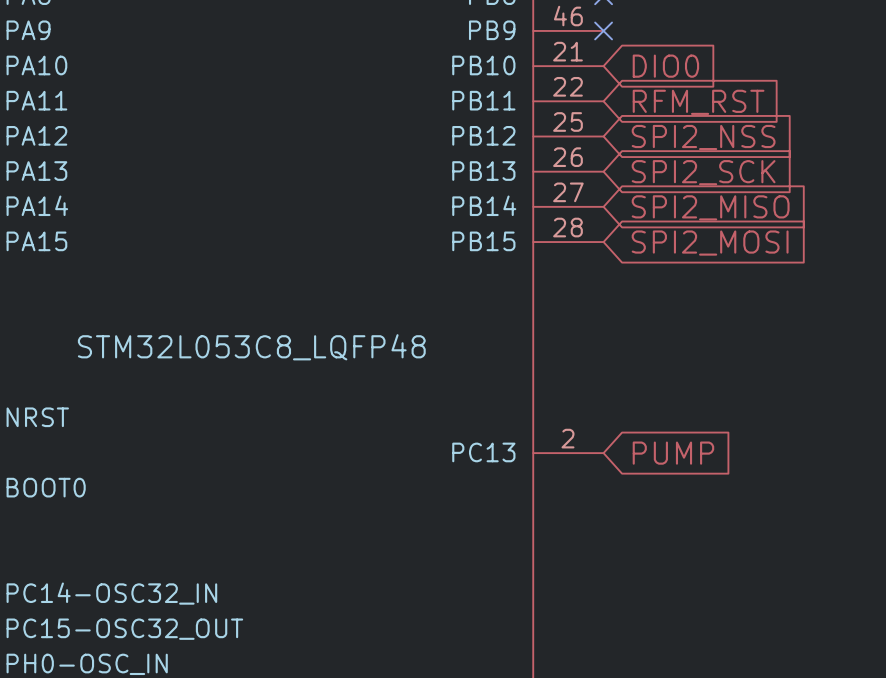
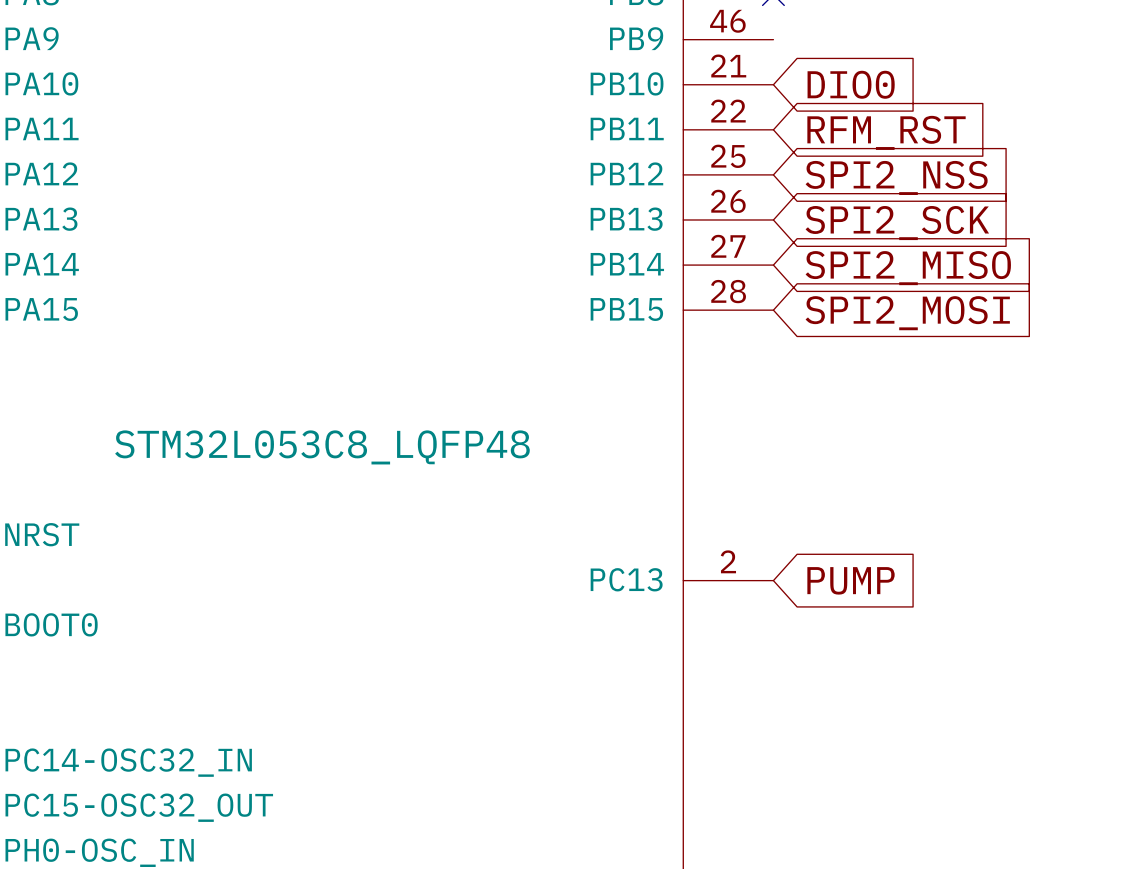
no-connect mark: (603, 30) -> none

